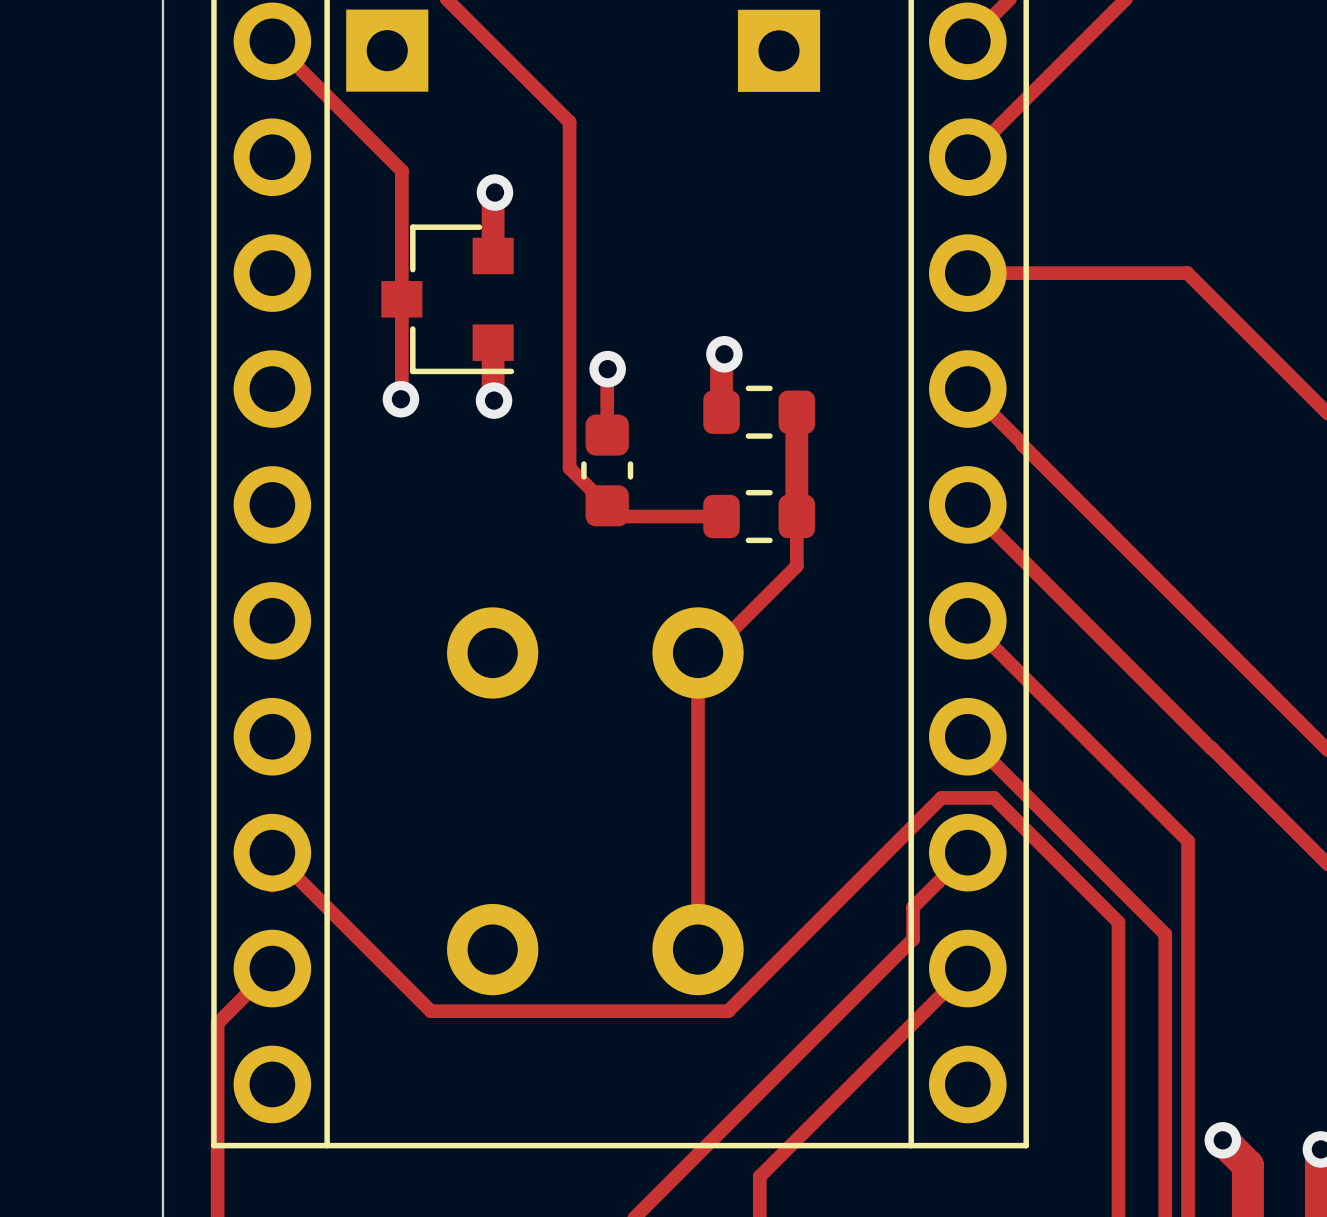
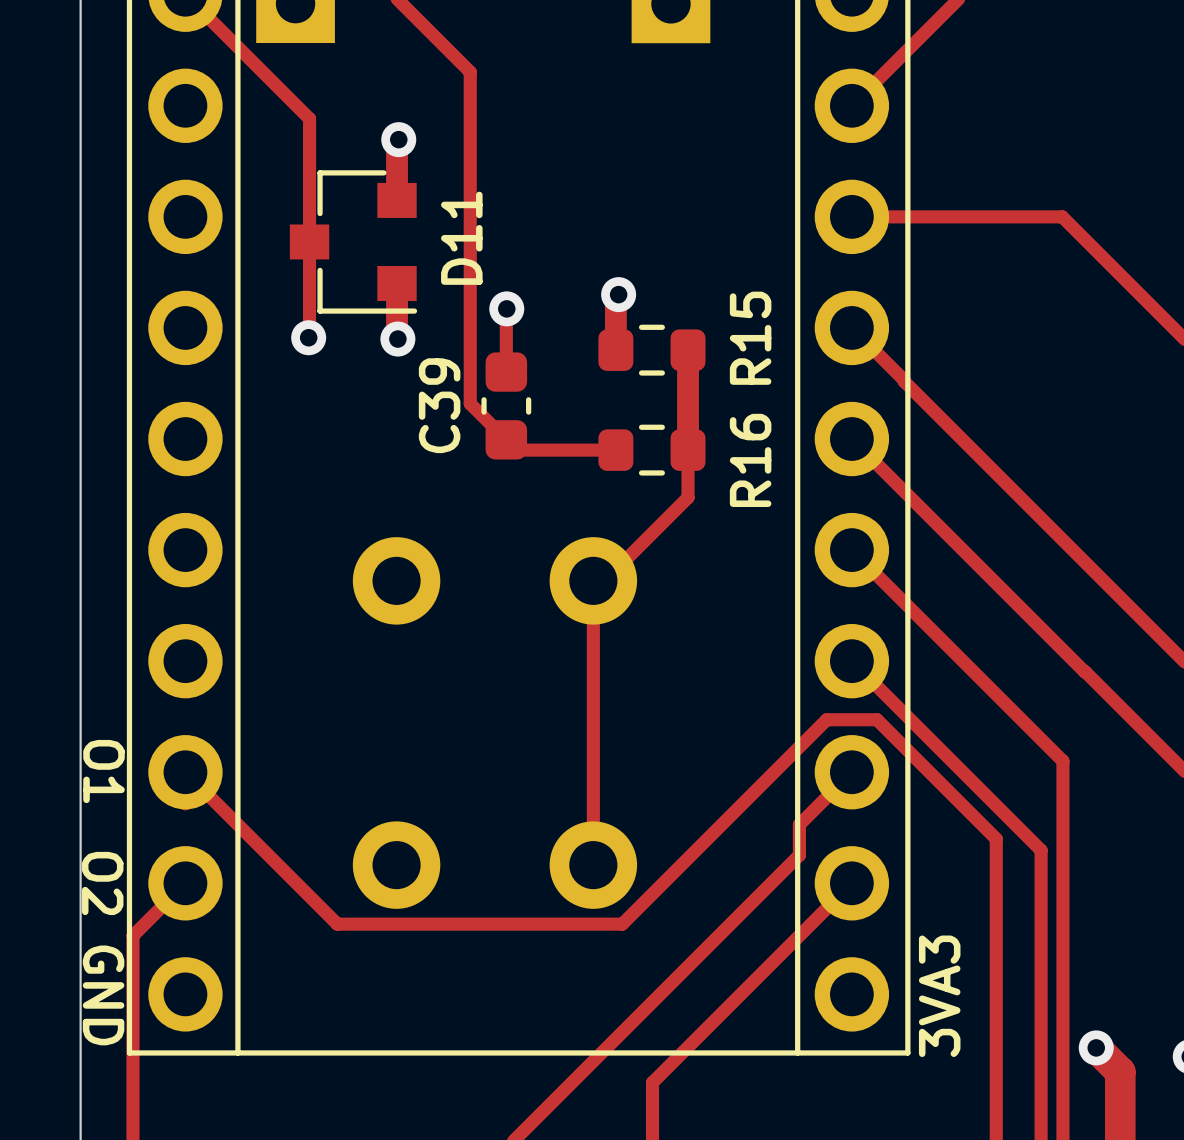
part value: none -> D11 (461, 238)
R15 name: none -> R15 (750, 338)
C39 name: none -> C39 (439, 405)
R16 name: none -> R16 (750, 460)
text: none -> O1 (104, 771)
text: none -> O2 (102, 883)
text: none -> GND (103, 995)
text: none -> 3VA3 (939, 996)

